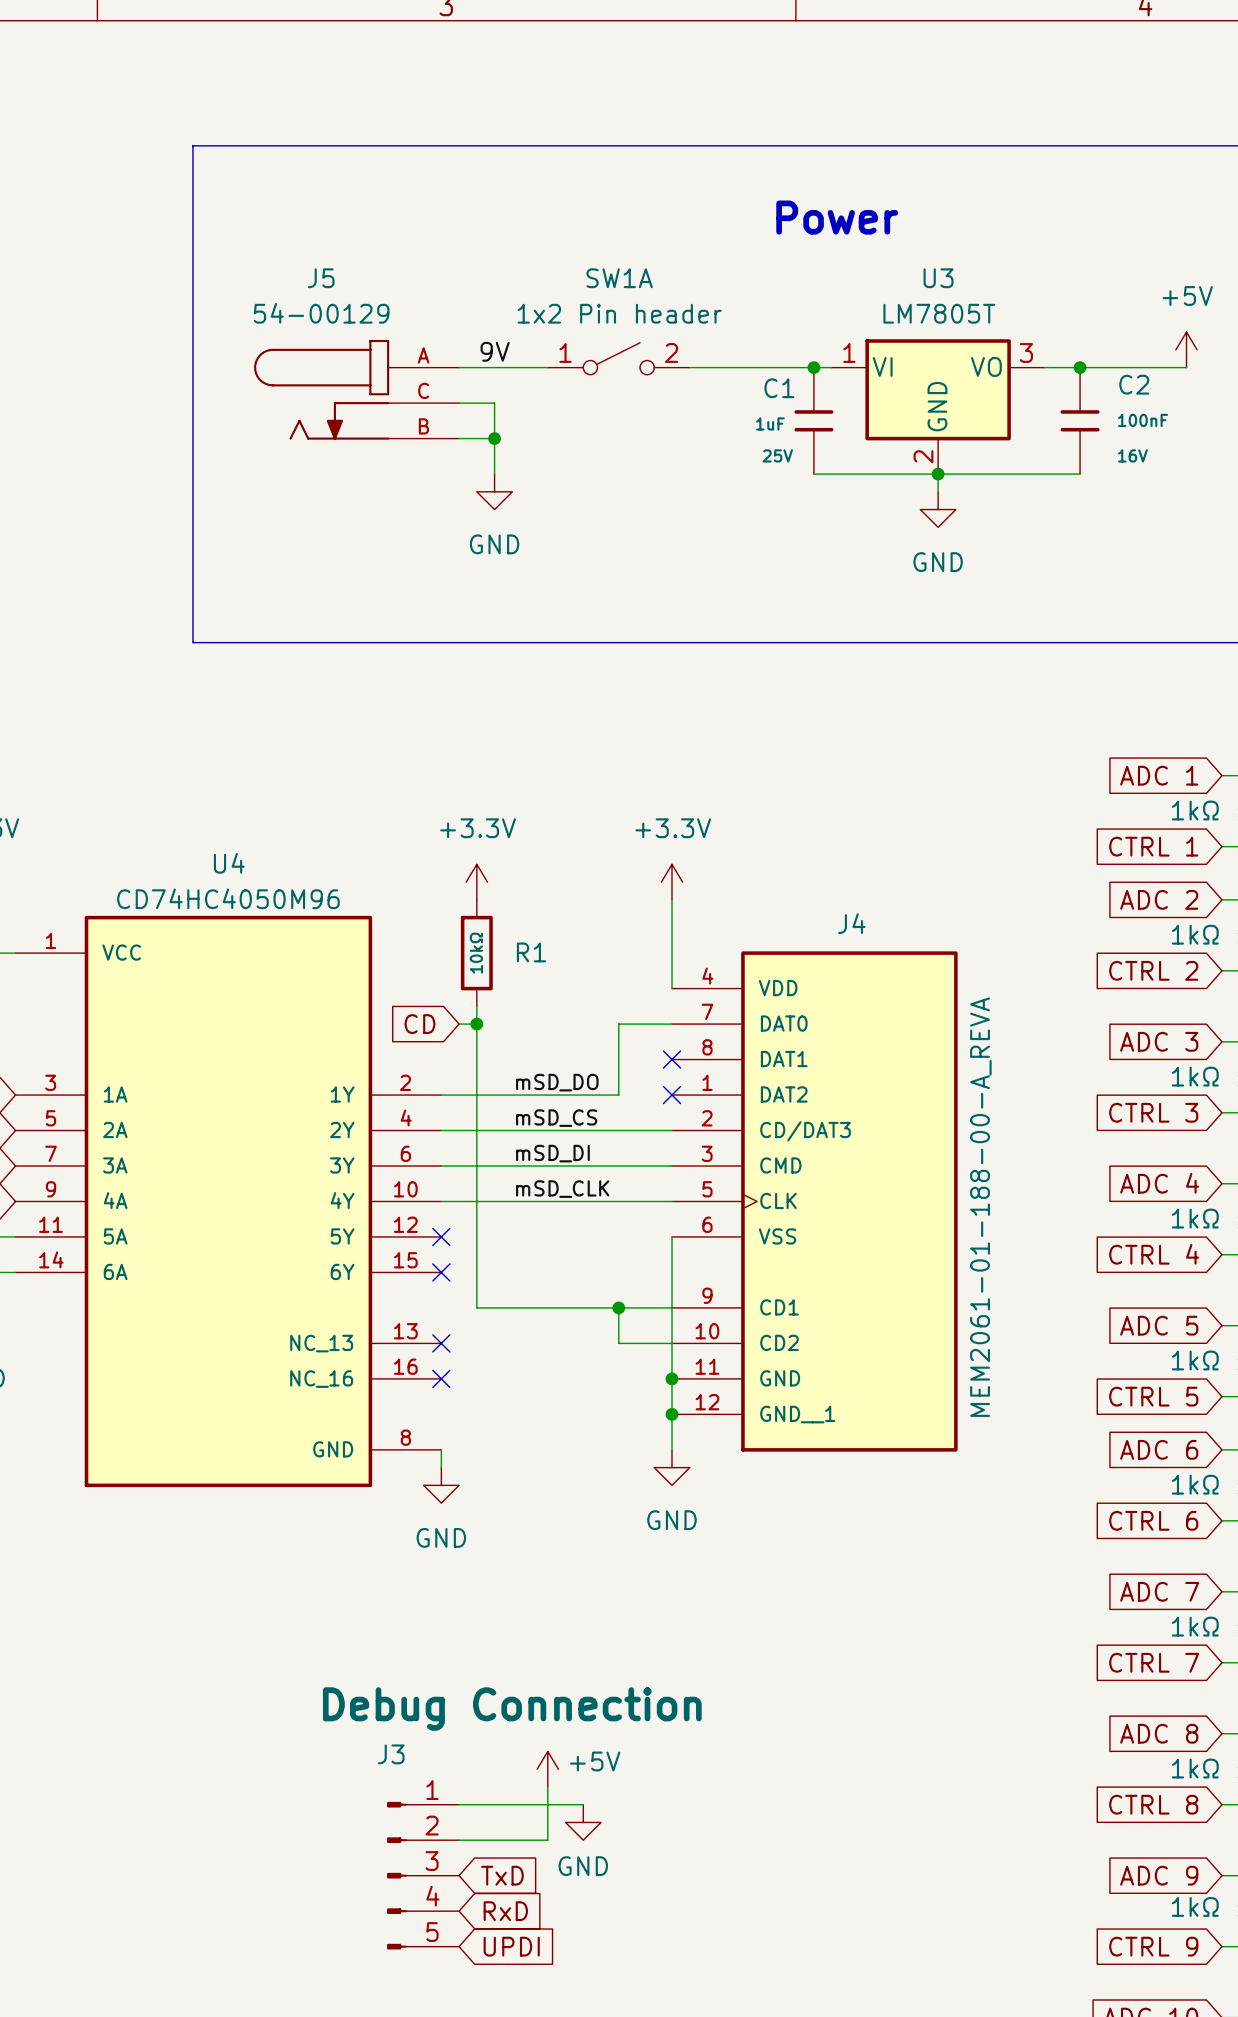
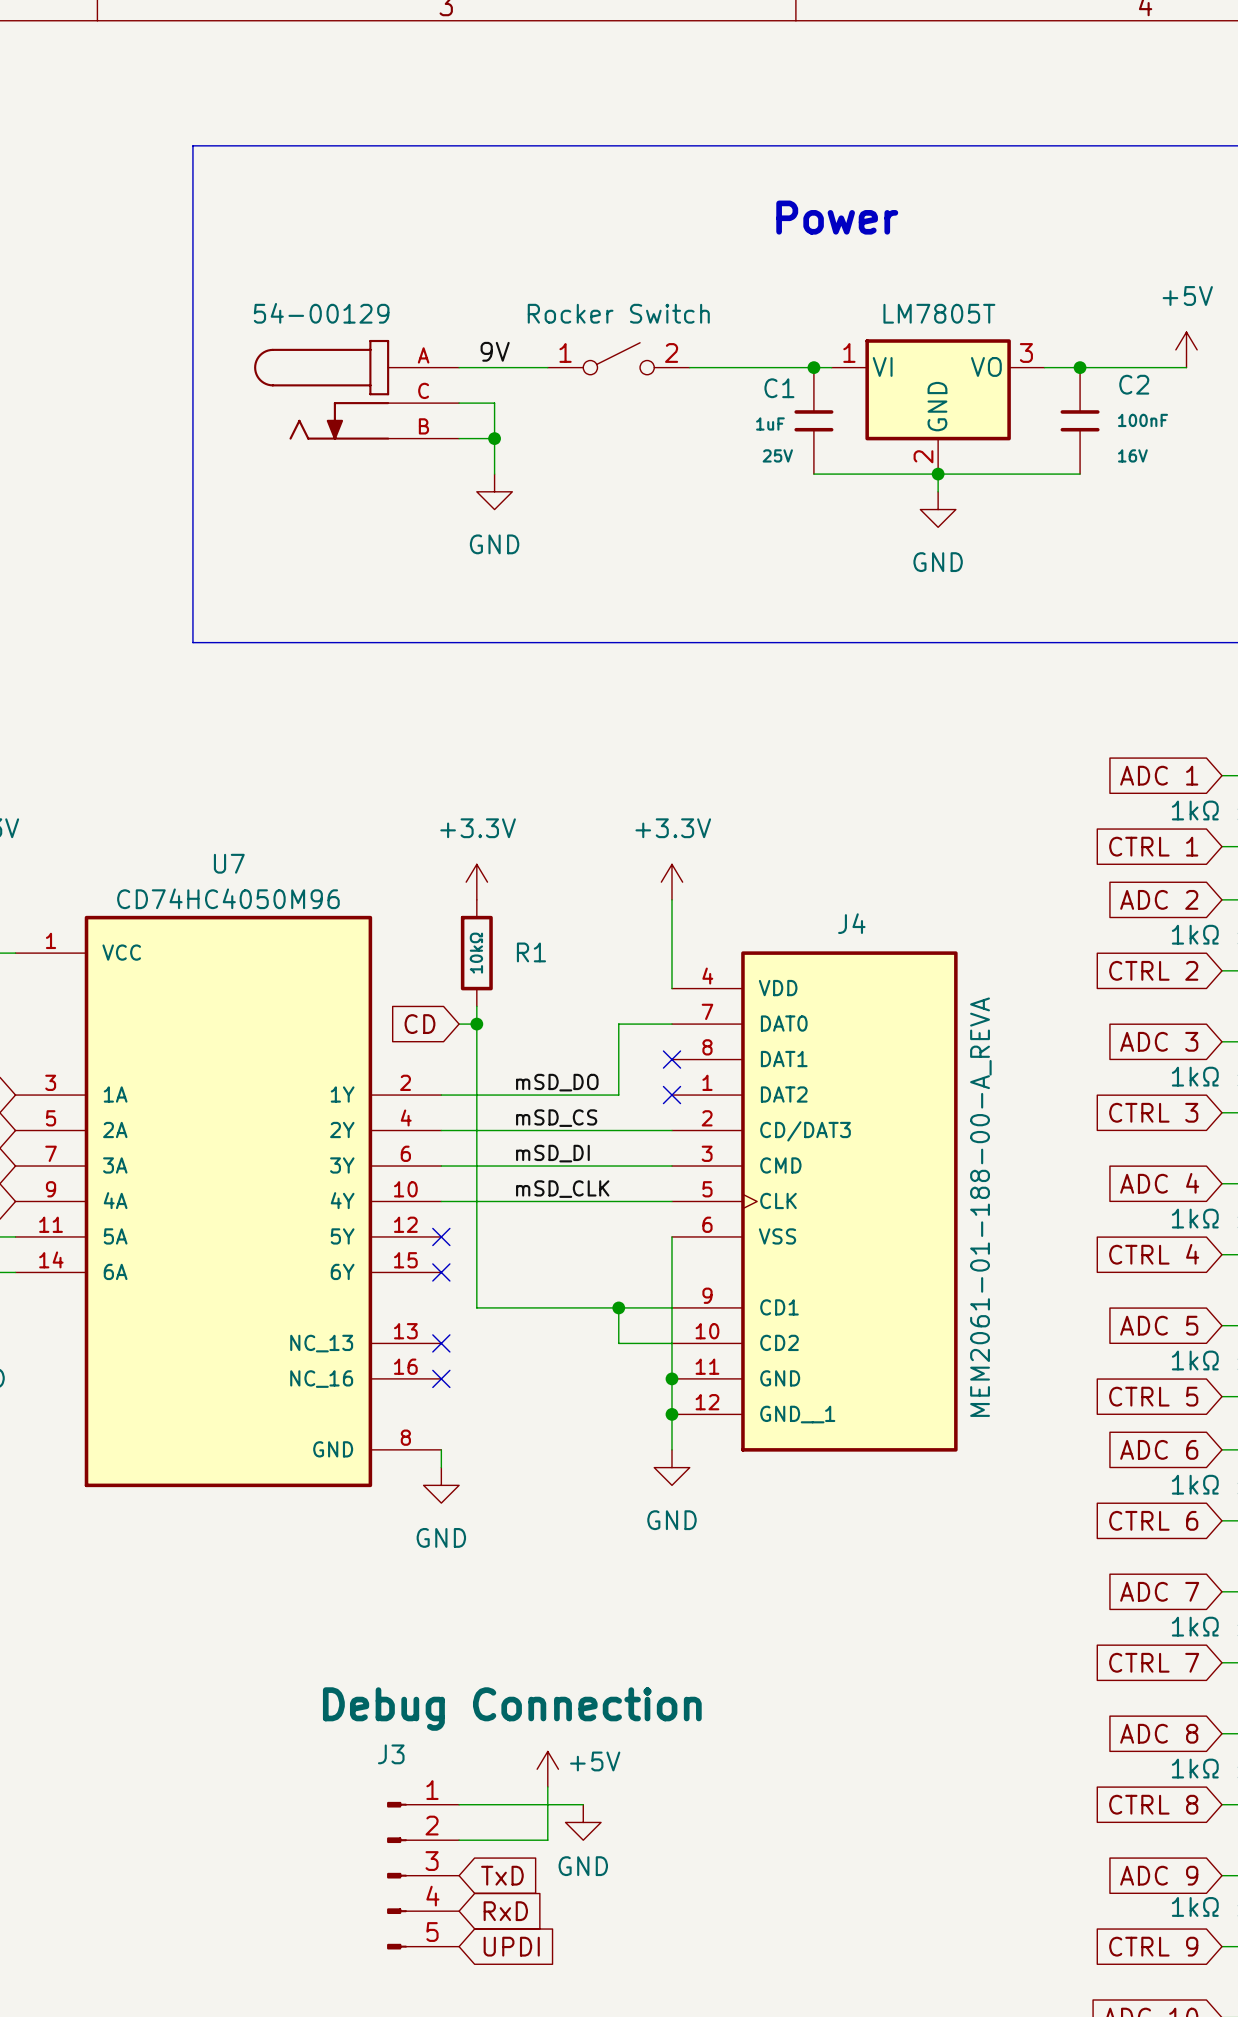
J5 name: J5 (321, 278) -> none
SW1A name: SW1A (619, 278) -> none
U3 name: U3 (938, 278) -> none
SW1A value: 1x2 Pin header (619, 313) -> Rocker Switch (618, 313)
U4 name: U4 (229, 863) -> U7 (229, 863)

